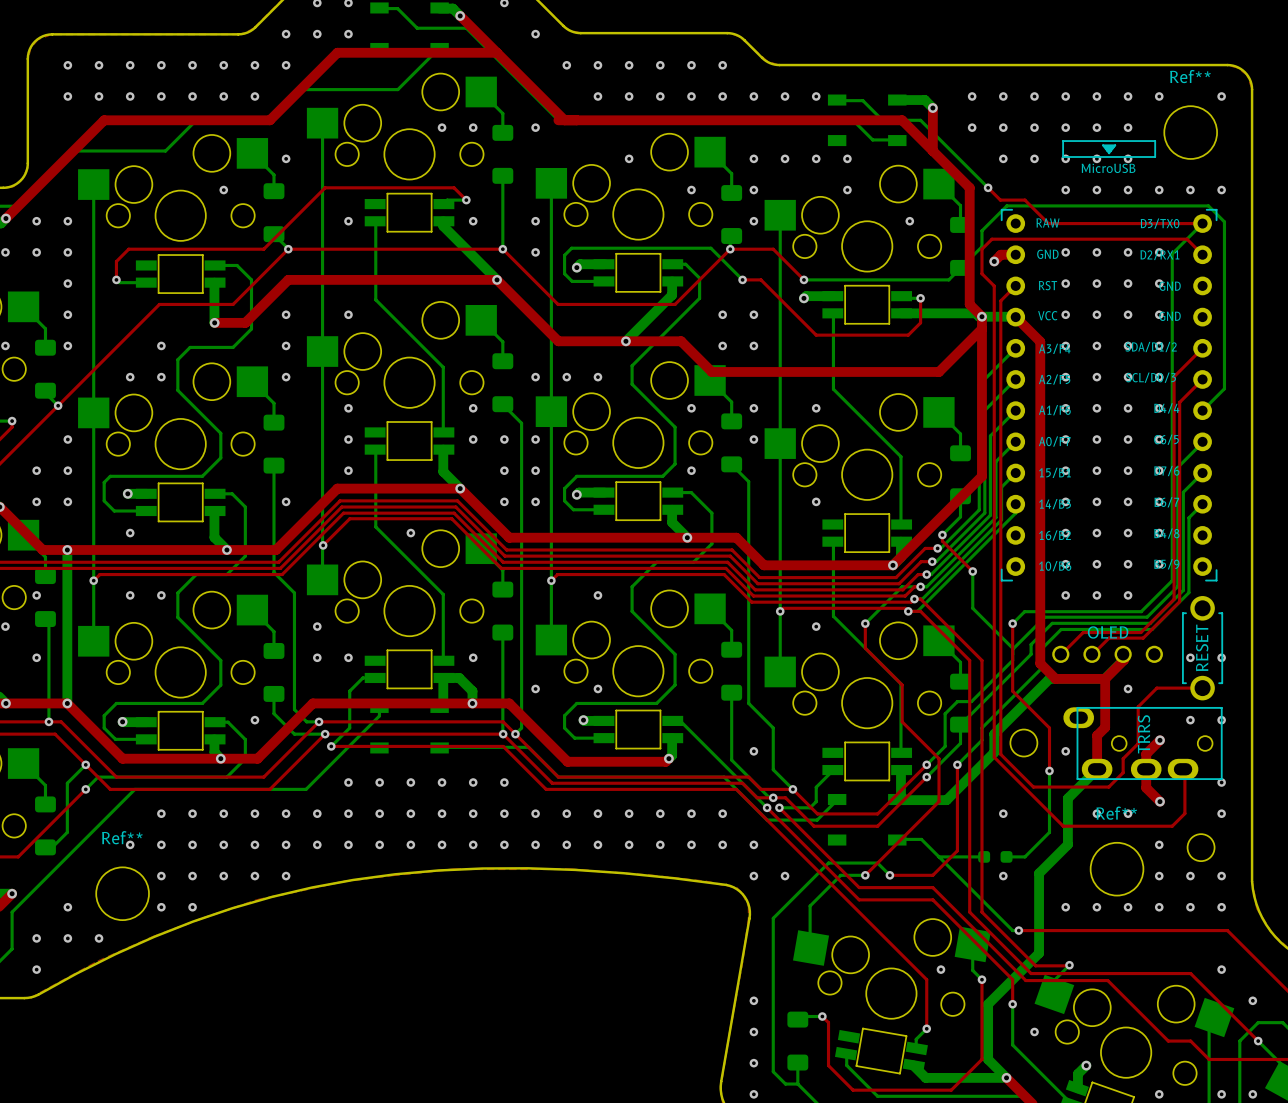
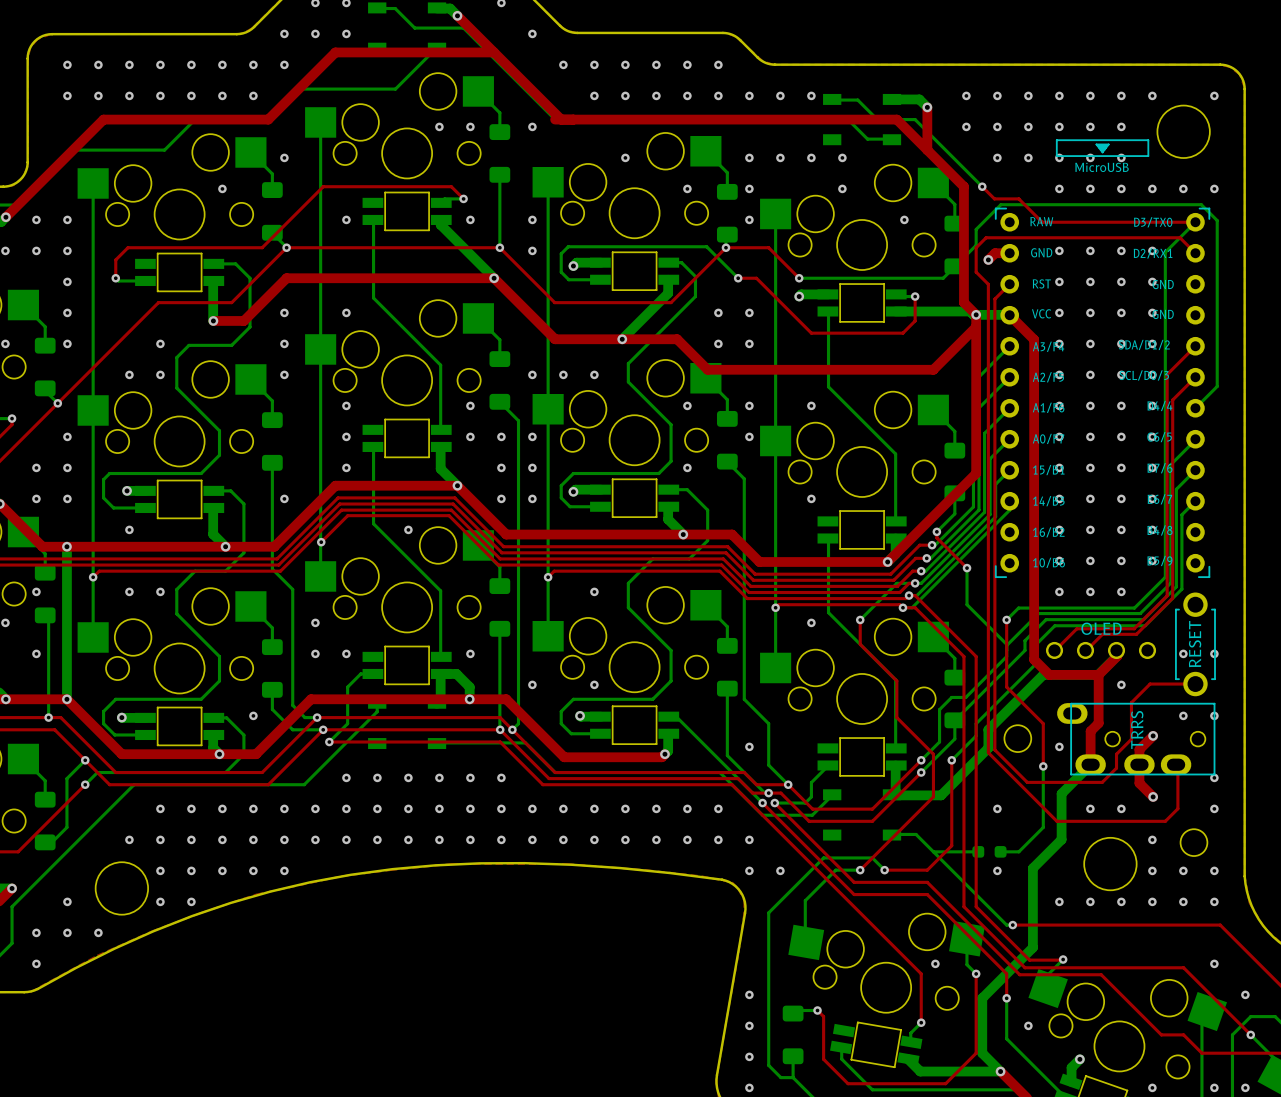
Ref** name: Ref** (1190, 76) -> none
Ref** name: Ref** (1116, 813) -> none
Ref** name: Ref** (122, 837) -> none

